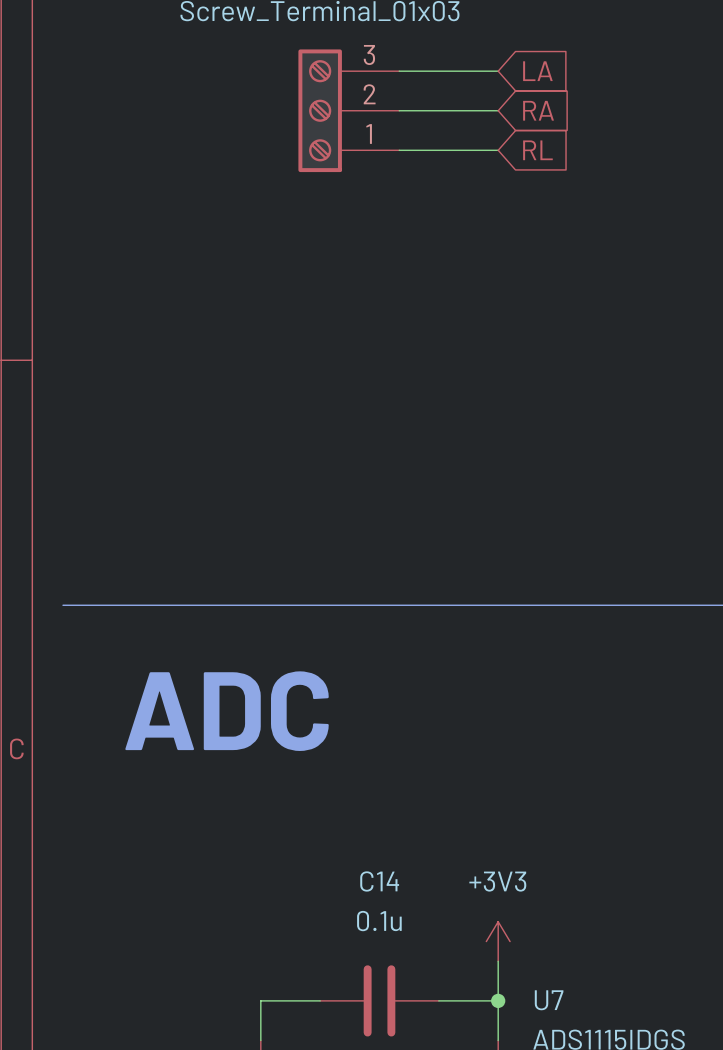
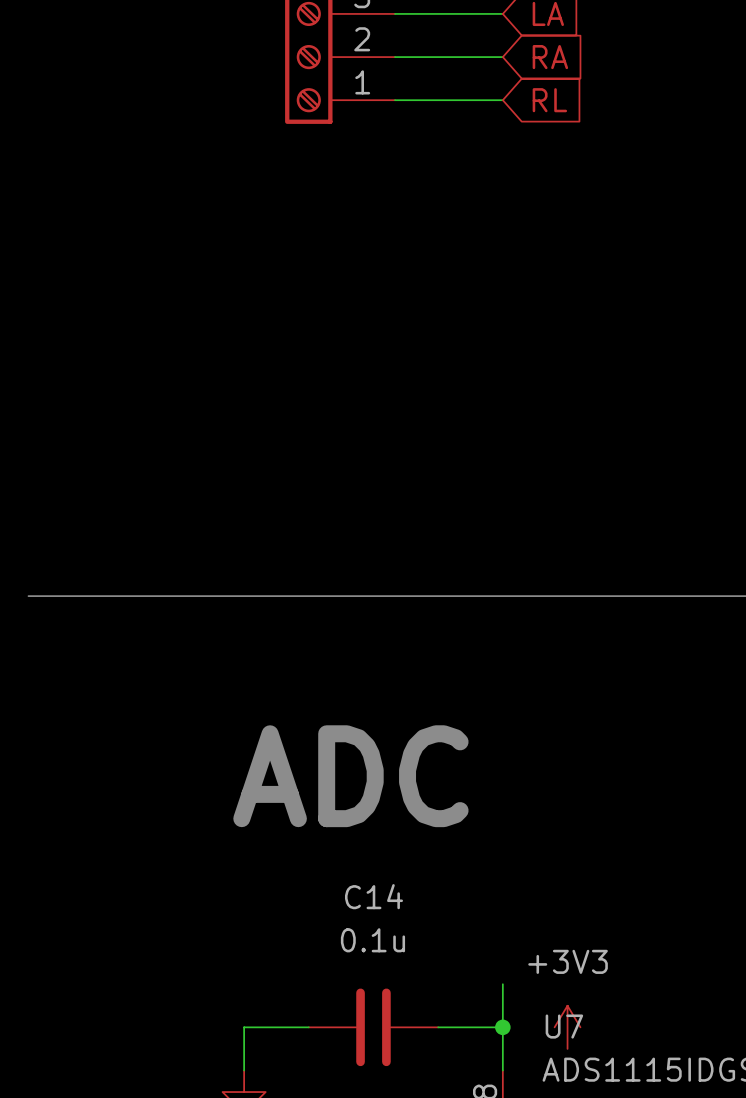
text position: ADC (226, 711) -> ADC (350, 776)
power symbol position: +3V3 (498, 941) -> +3V3 (567, 1027)

